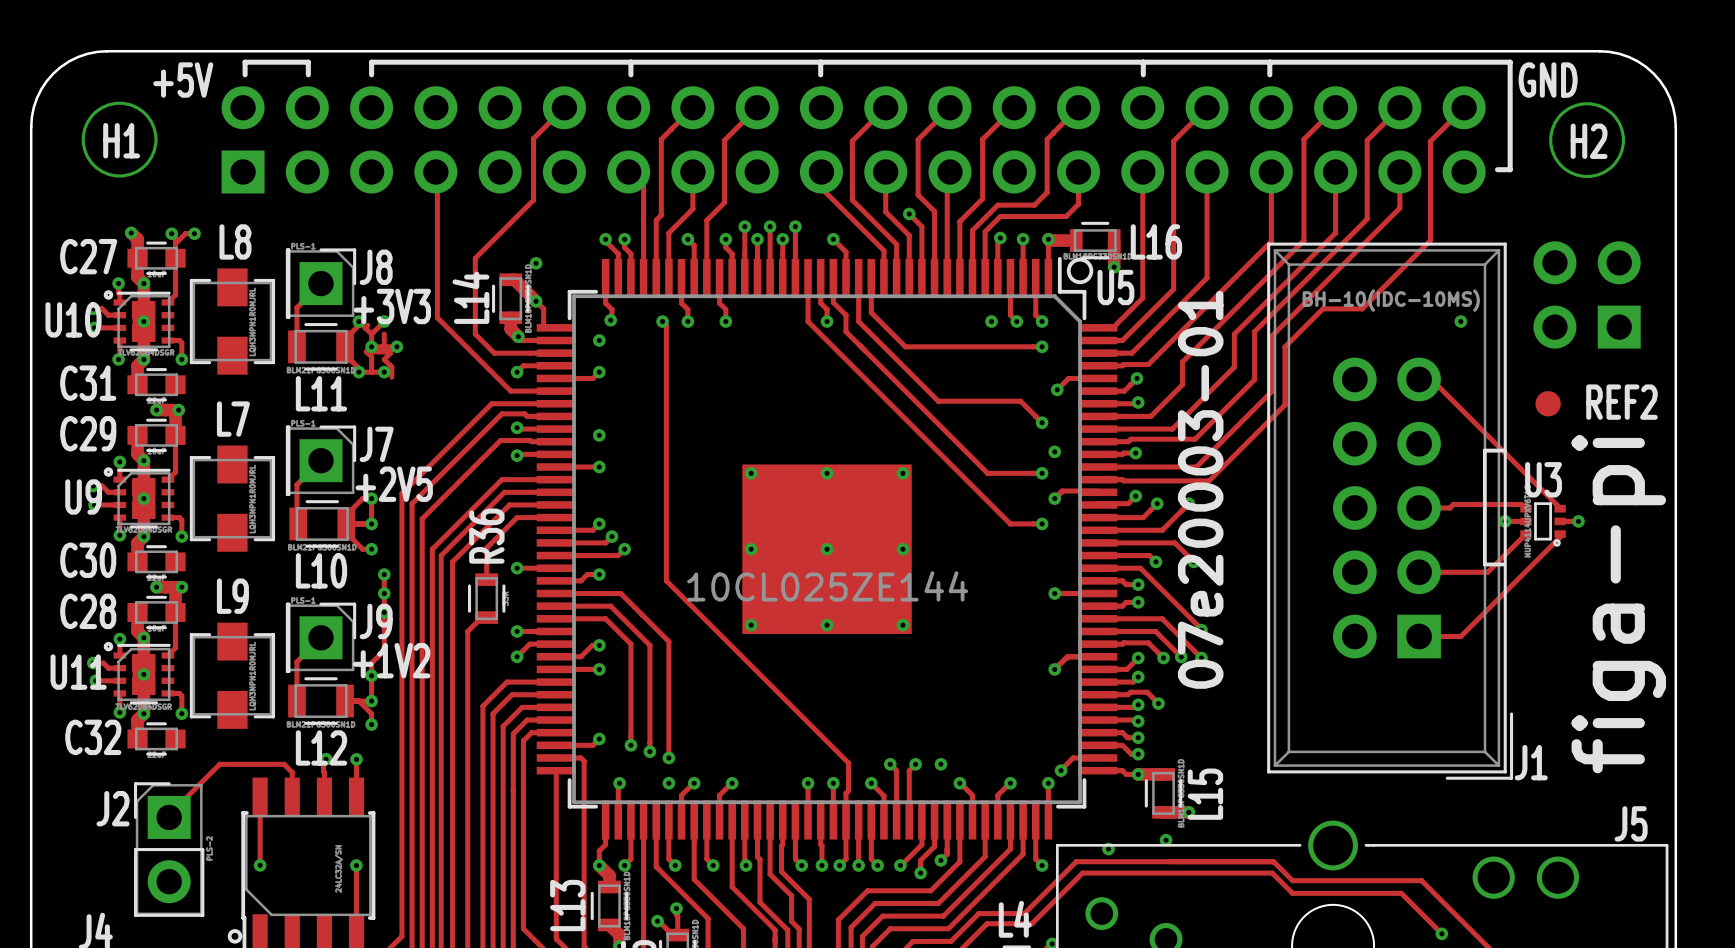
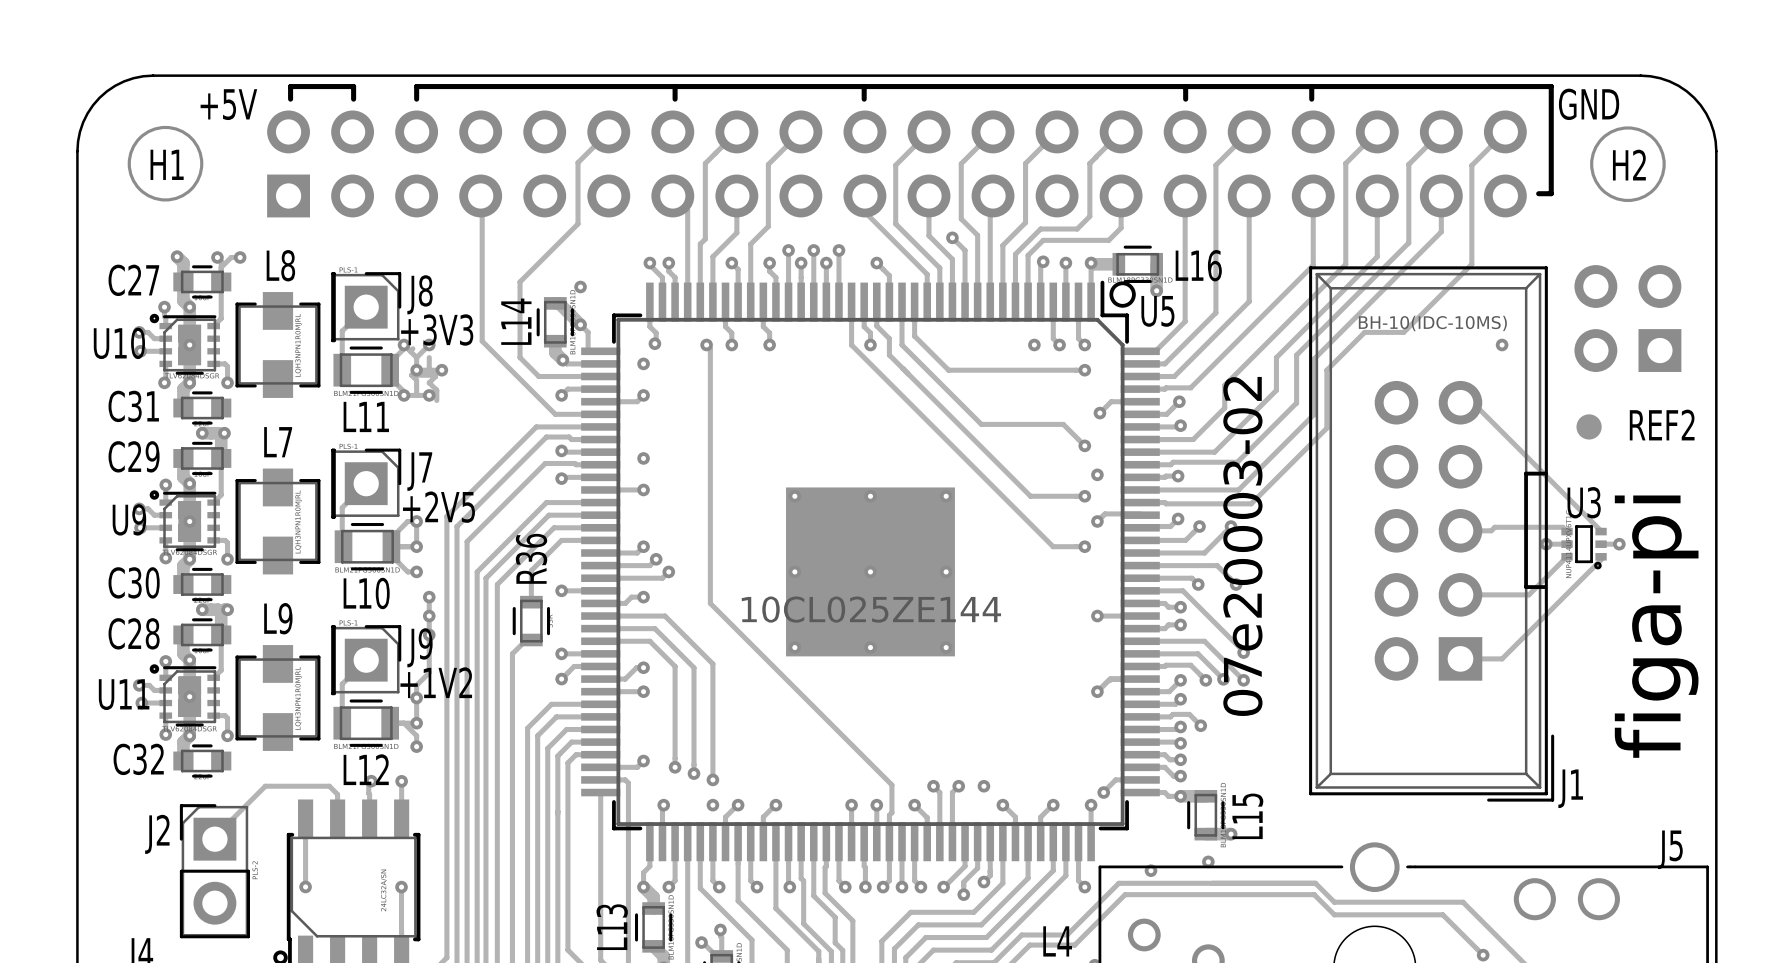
text: 07e20003-01 (1200, 489) -> 07e20003-02 (1242, 546)

